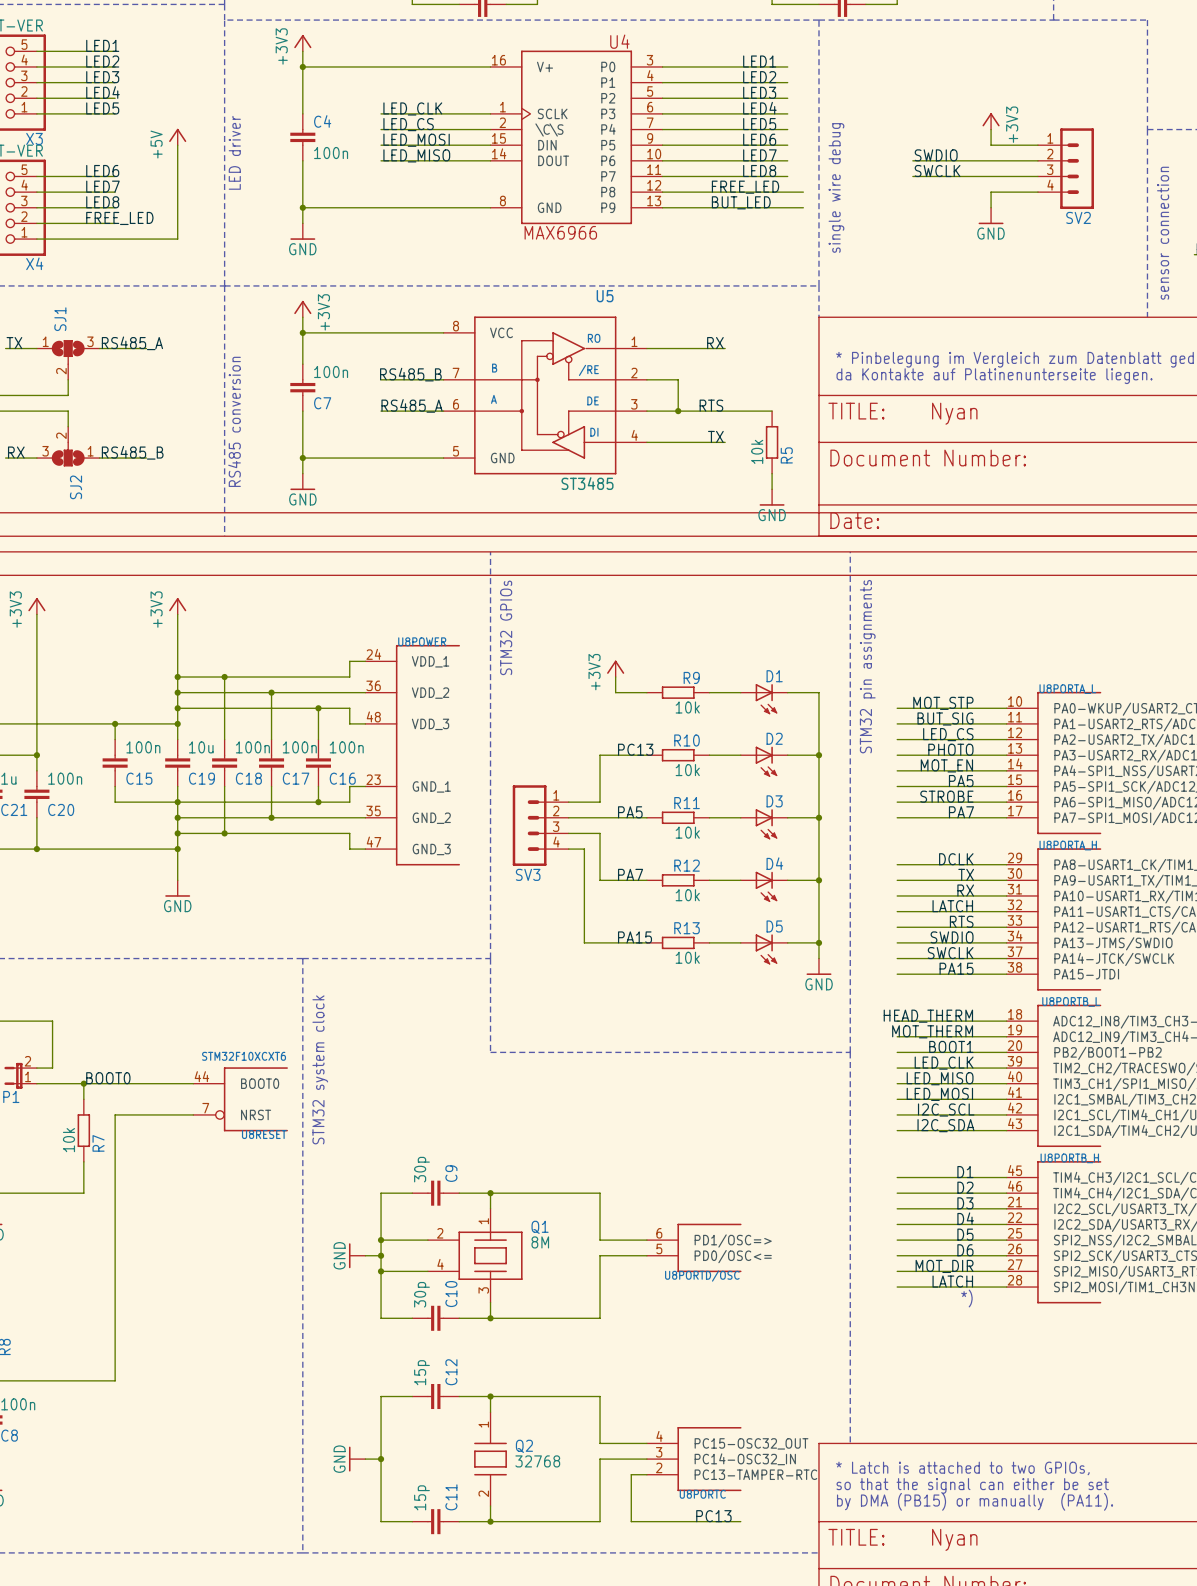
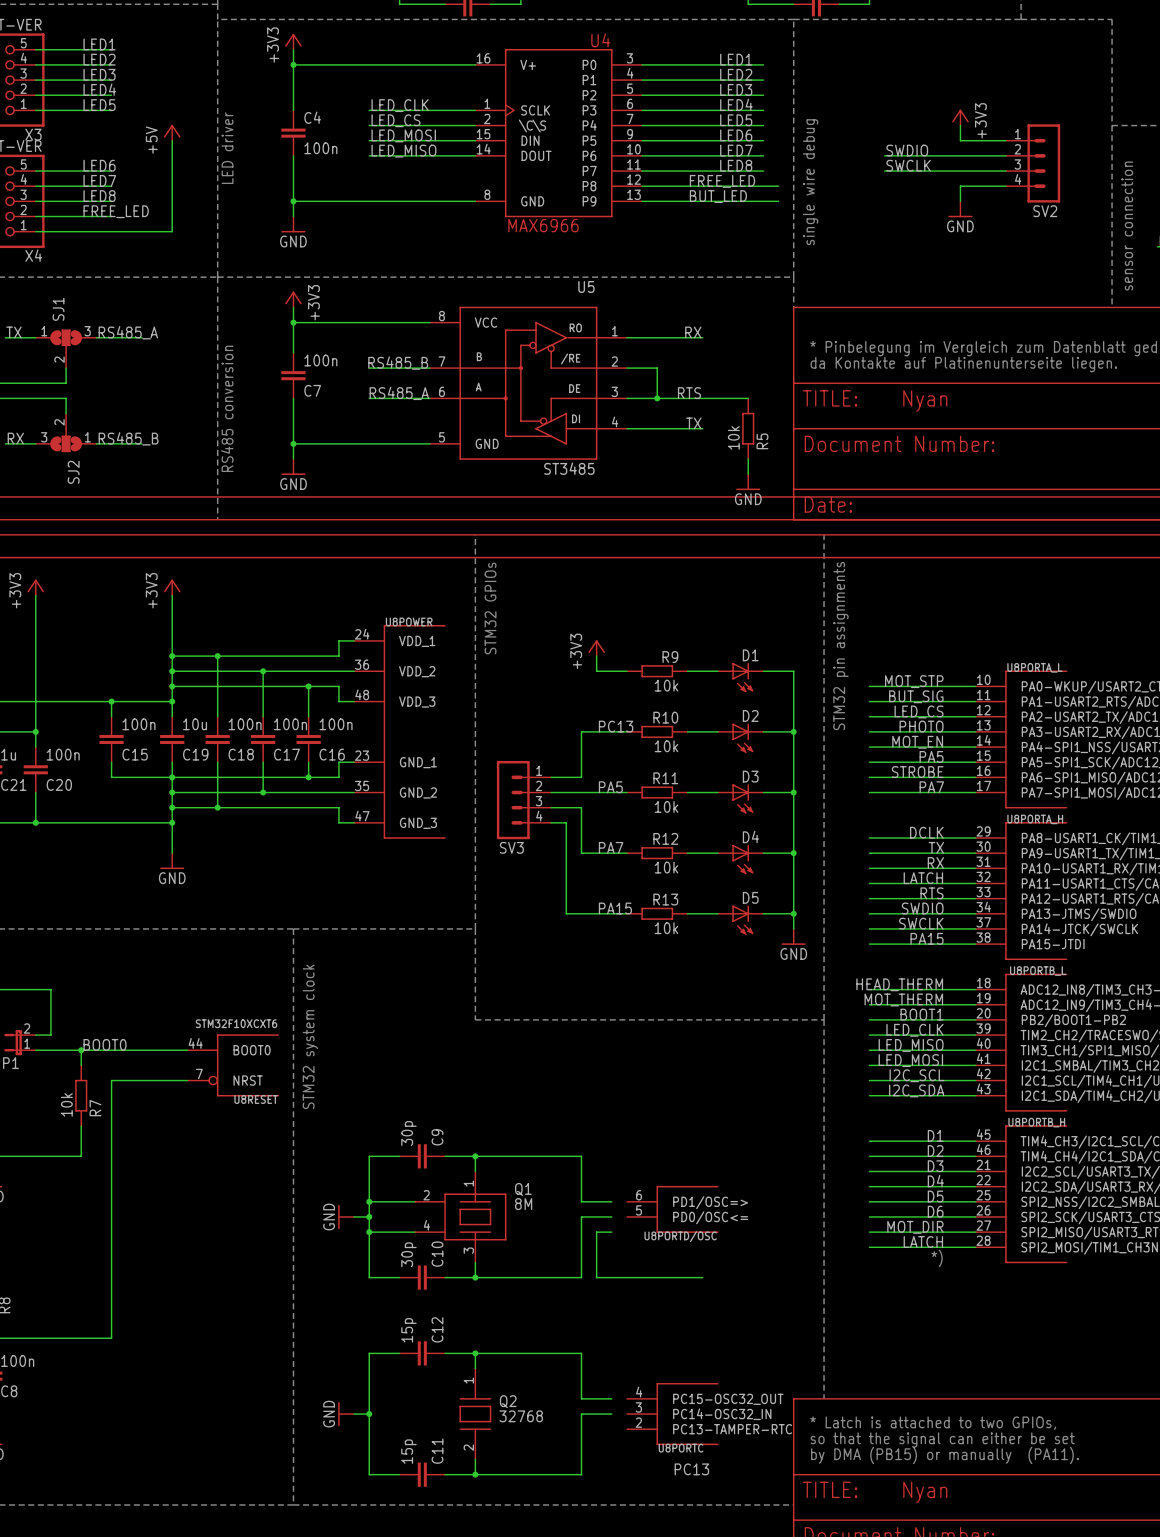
wire: (631, 1240) (646, 1240) -> none
wire: (631, 1255) (646, 1255) -> none
wire: none -> (611, 1232) (596, 1232) (596, 1277) (702, 1277)
wire: (631, 1443) (646, 1443) -> none
wire: (631, 1459) (646, 1459) -> none
wire: (646, 1474) (631, 1474) (631, 1521) (740, 1521) -> none

